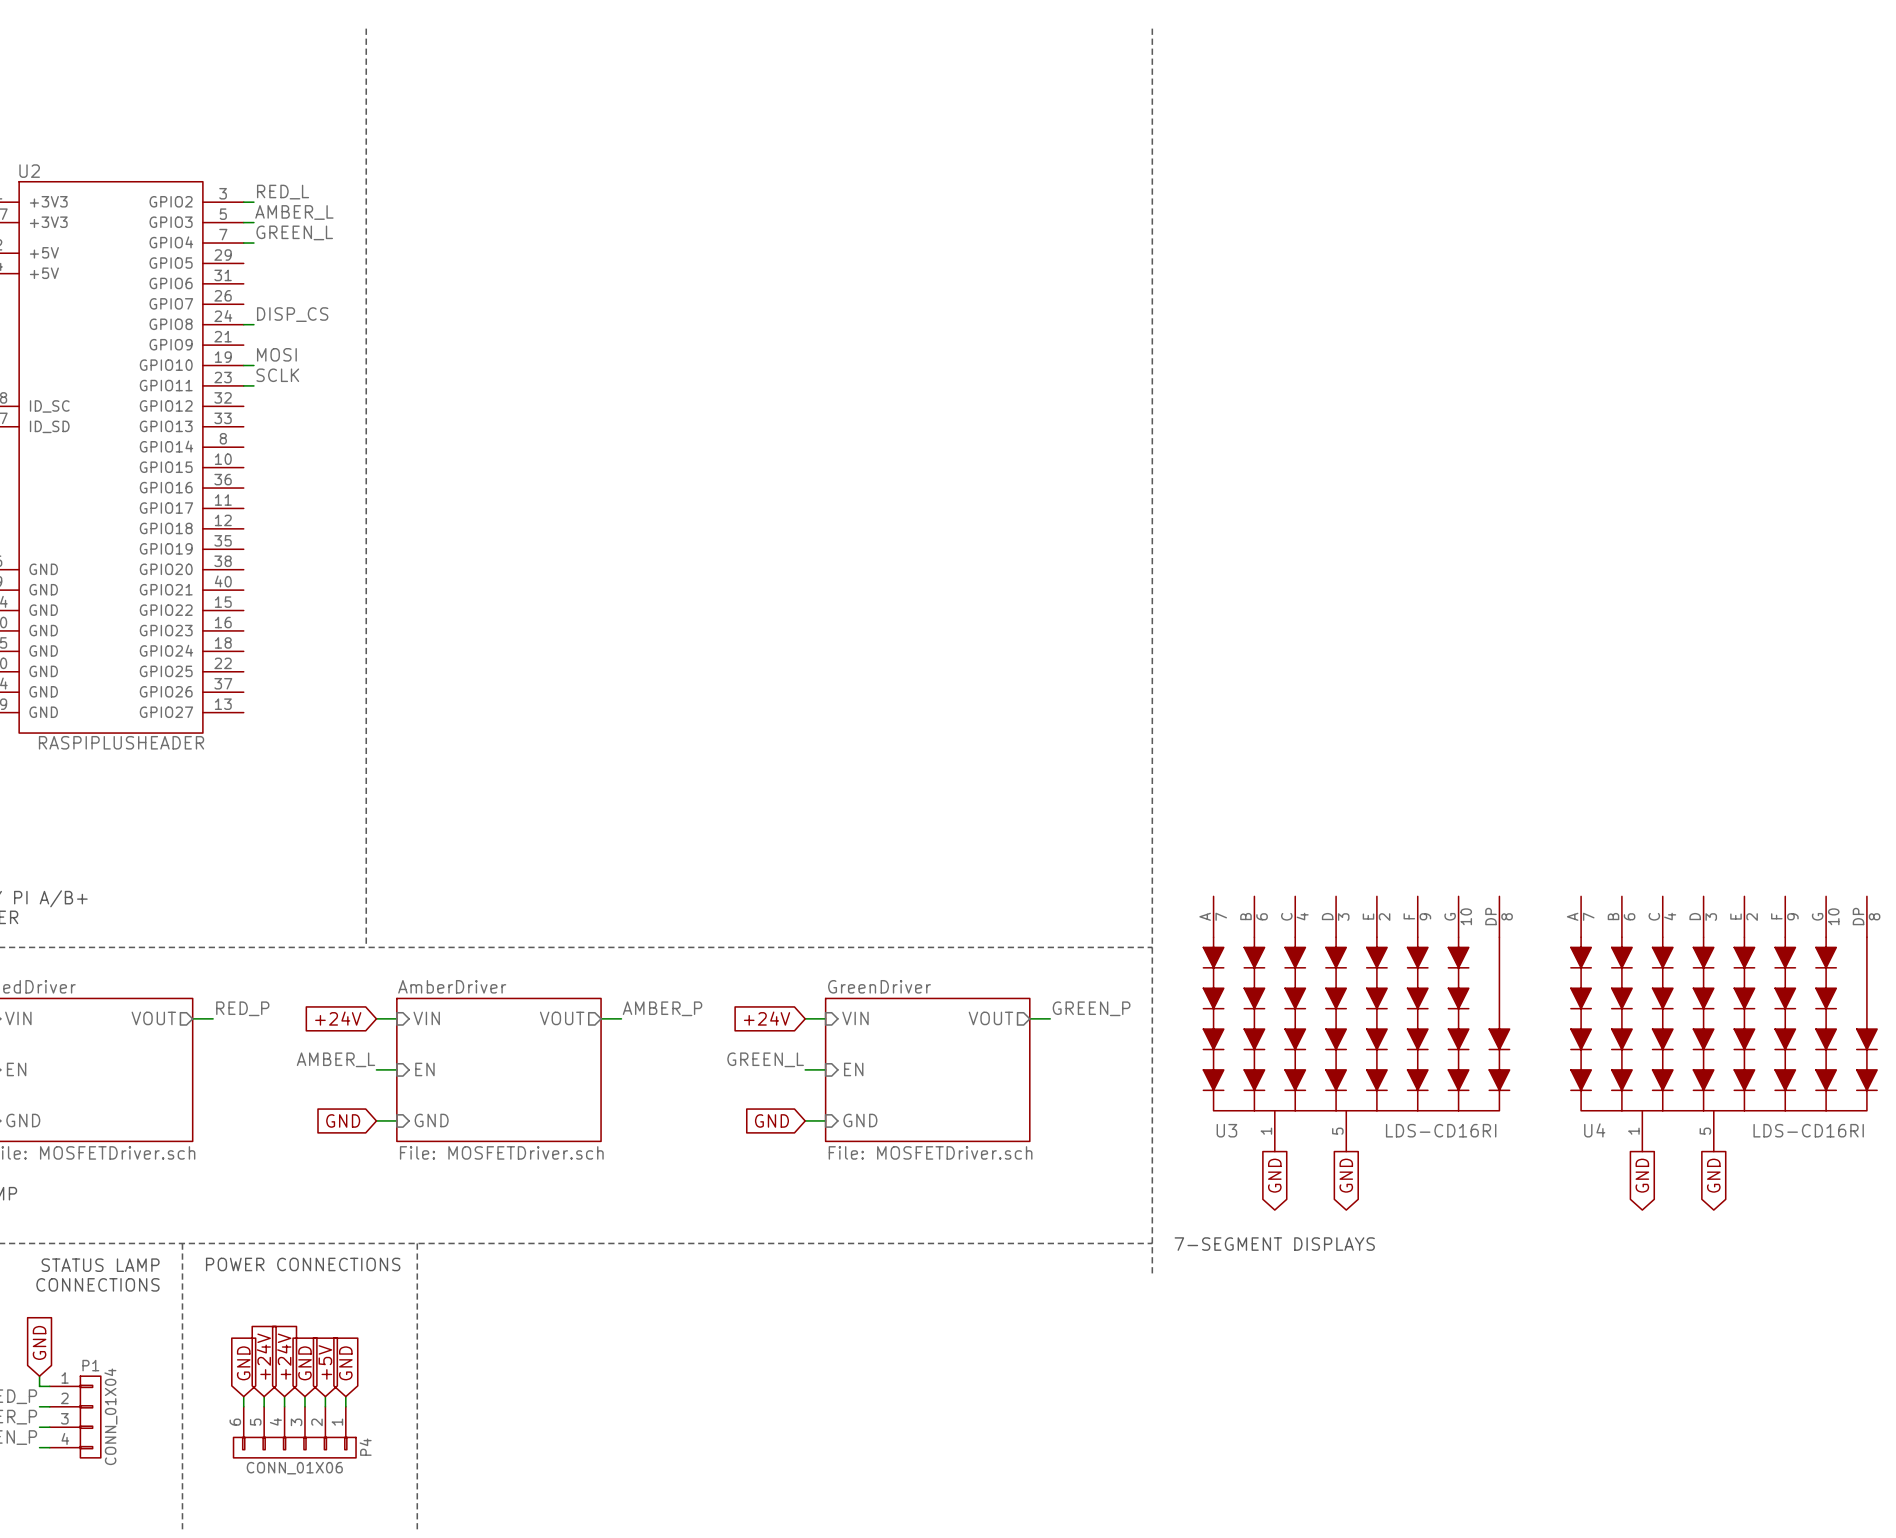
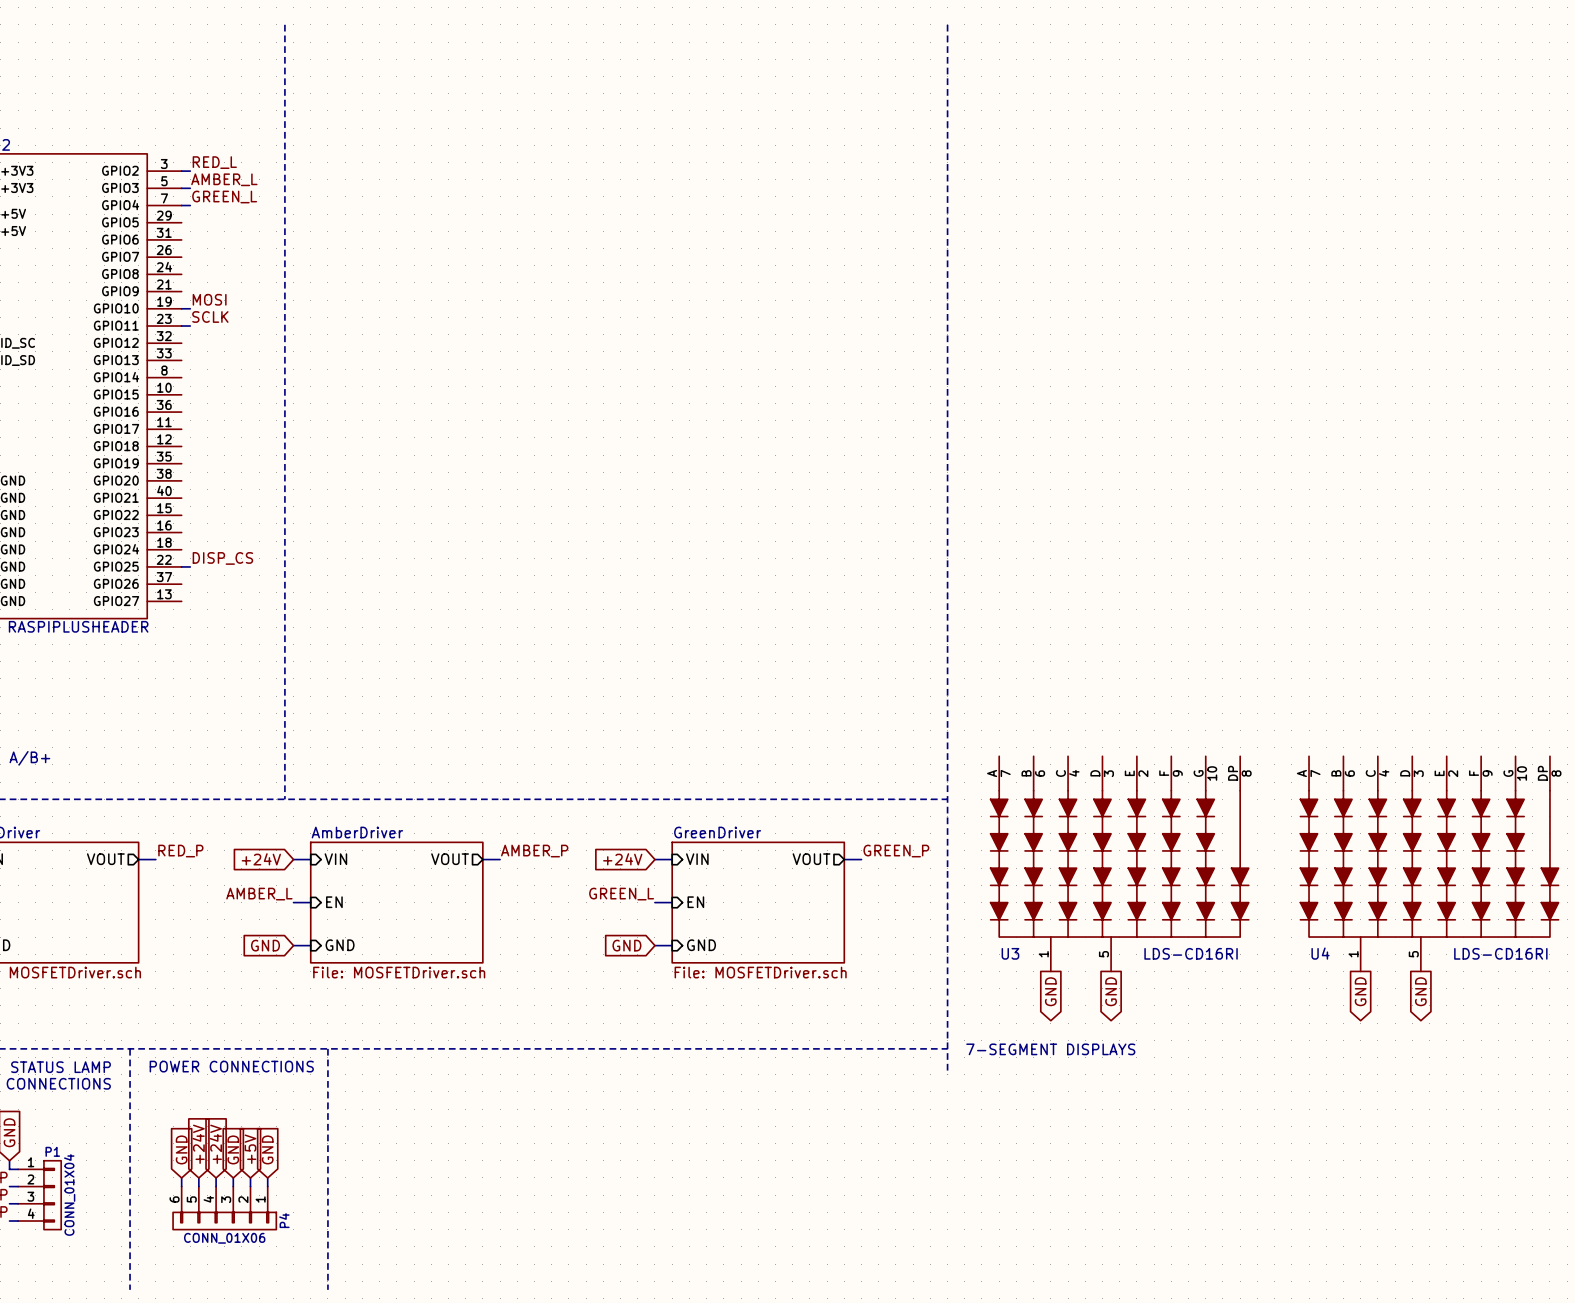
label: DISP_CS (292, 314) -> none
wire: (243, 324) (253, 324) -> none
label: none -> DISP_CS (222, 558)
wire: none -> (181, 566) (190, 566)

